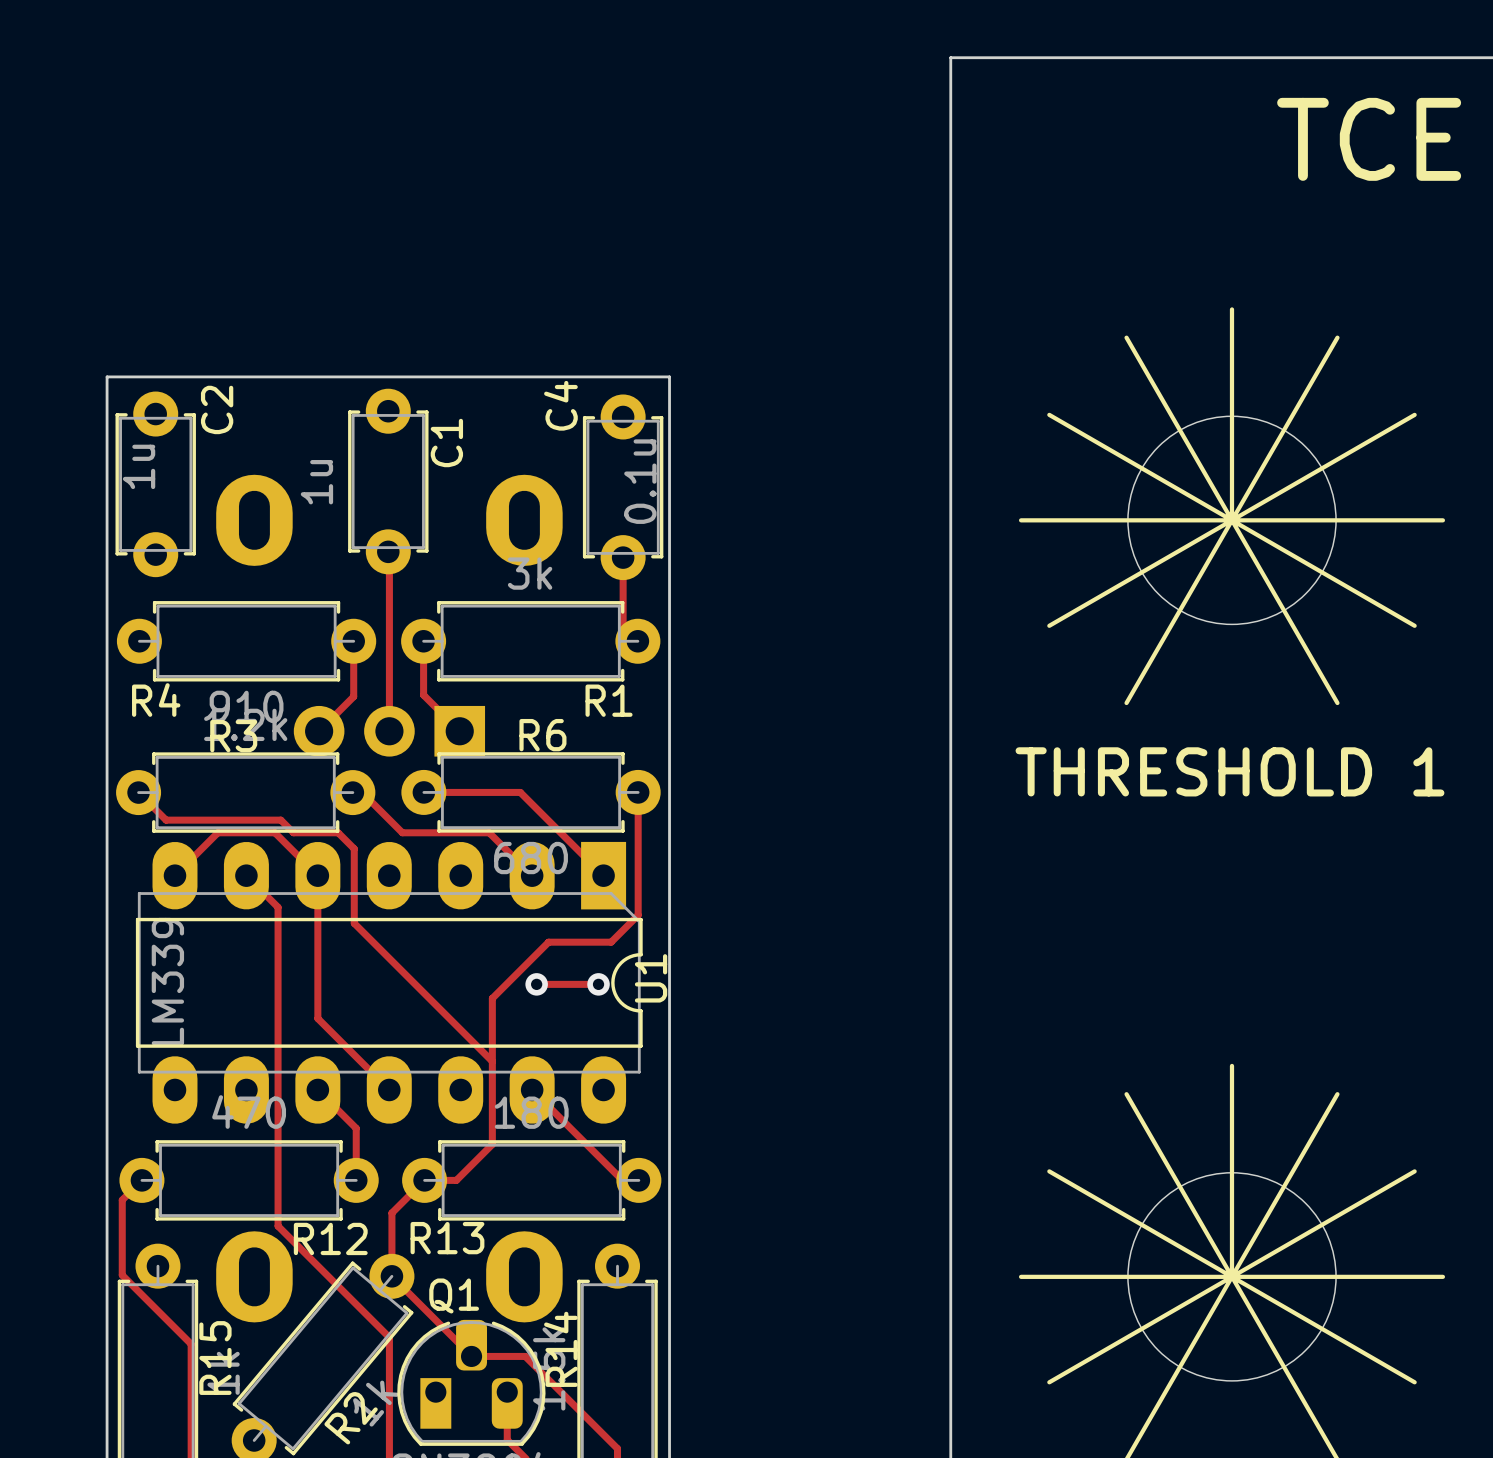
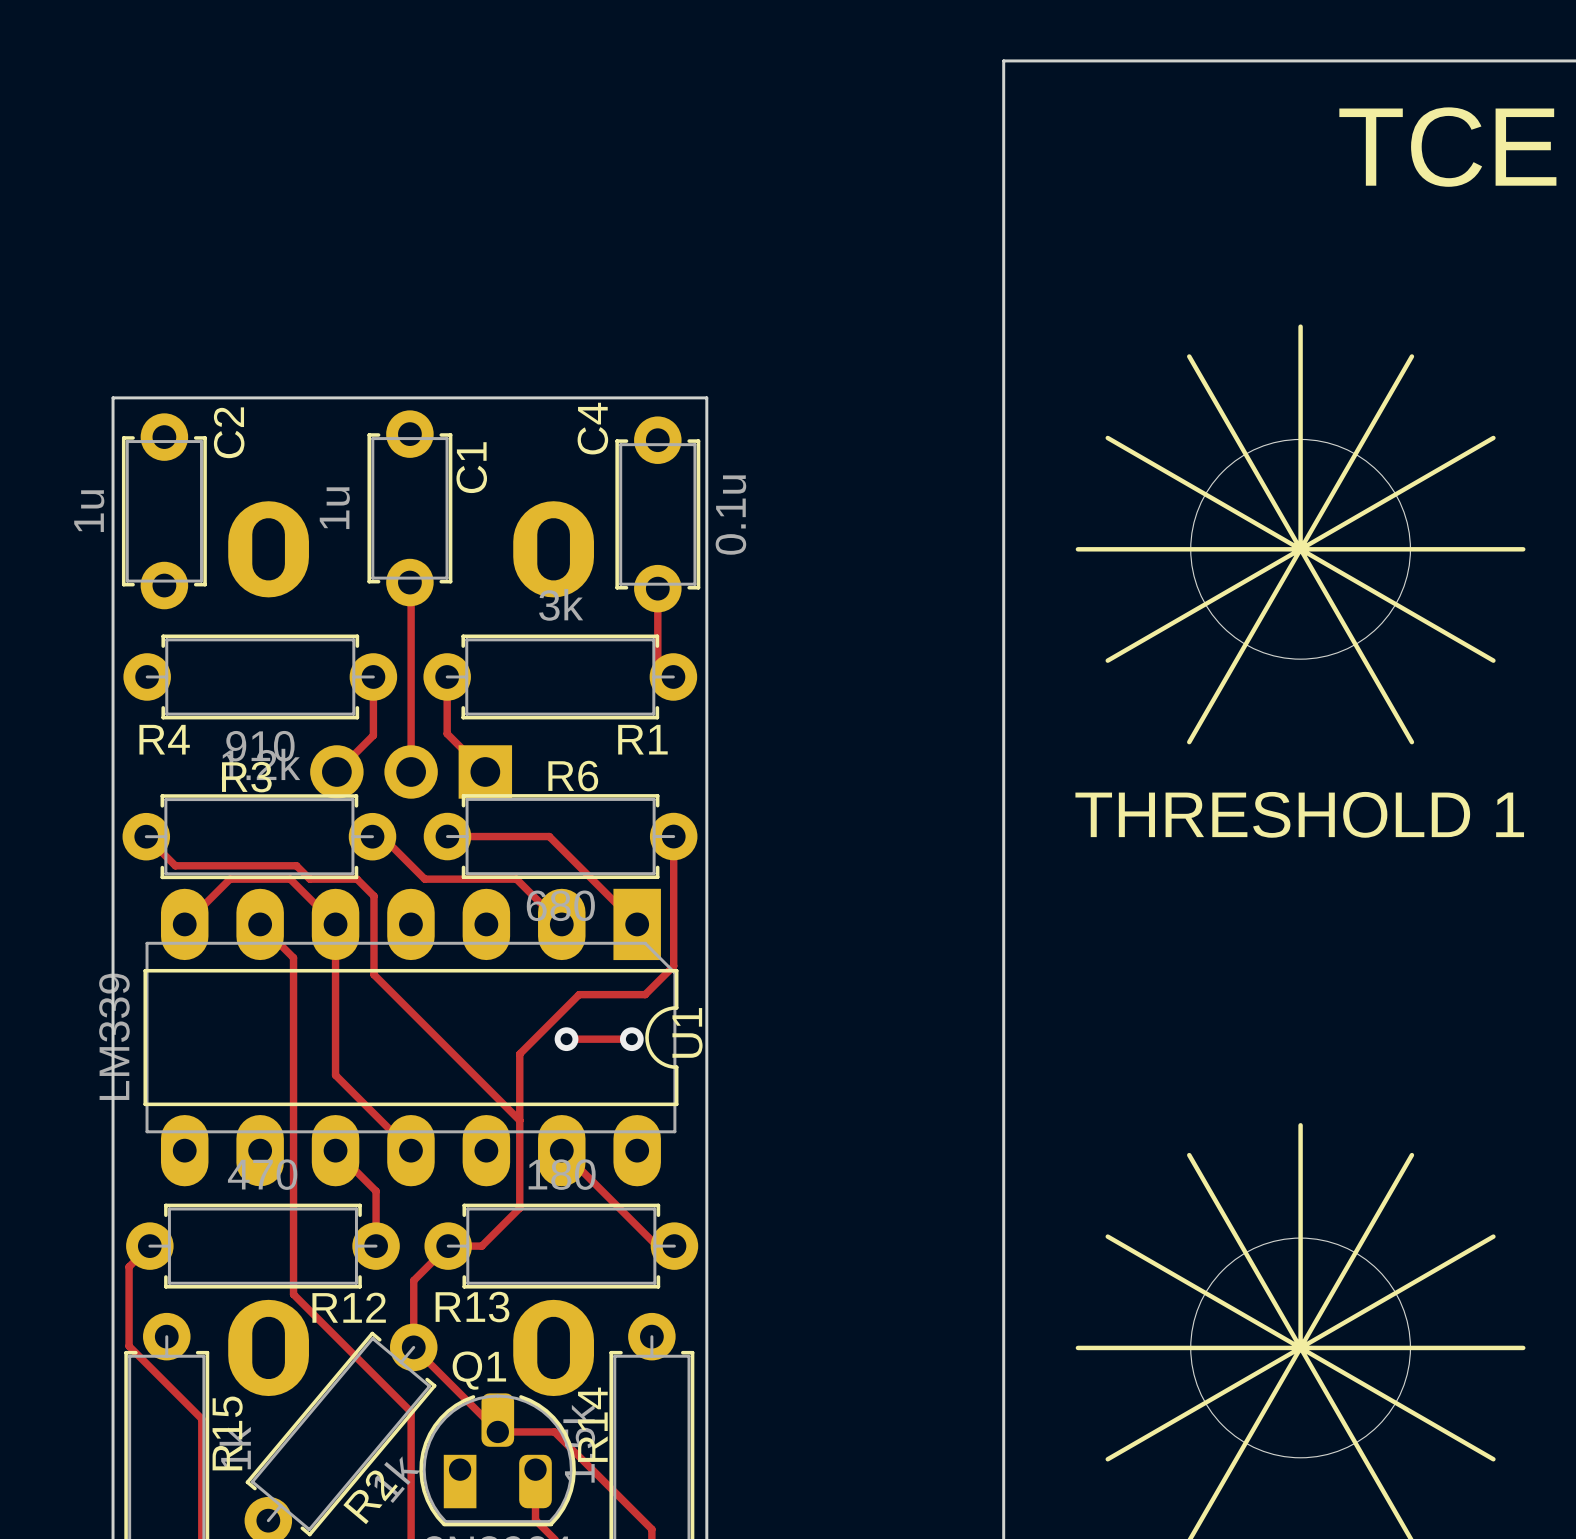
C2 value position: 1u (139, 466) -> 1u (89, 511)
C4 value position: 0.1u (640, 481) -> 0.1u (730, 515)
U1 value position: LM339 (167, 981) -> LM339 (114, 1036)

